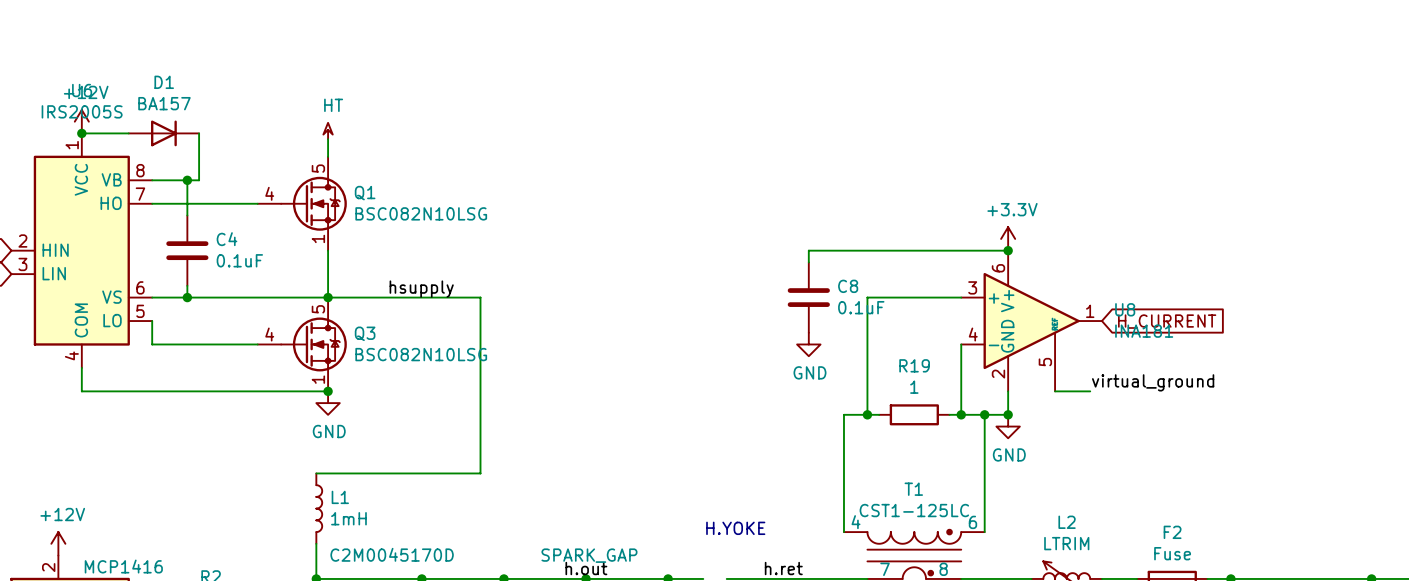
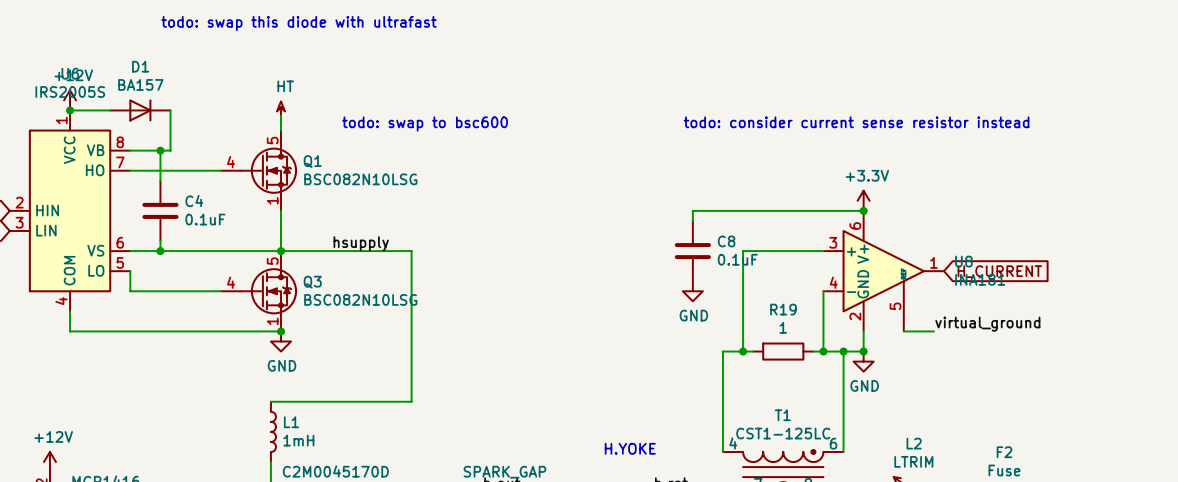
text: none -> todo: swap this diode with ultrafast (299, 23)
text: none -> todo: consider current sense resistor instead (856, 122)
text: none -> todo: swap to bsc600 (425, 123)

